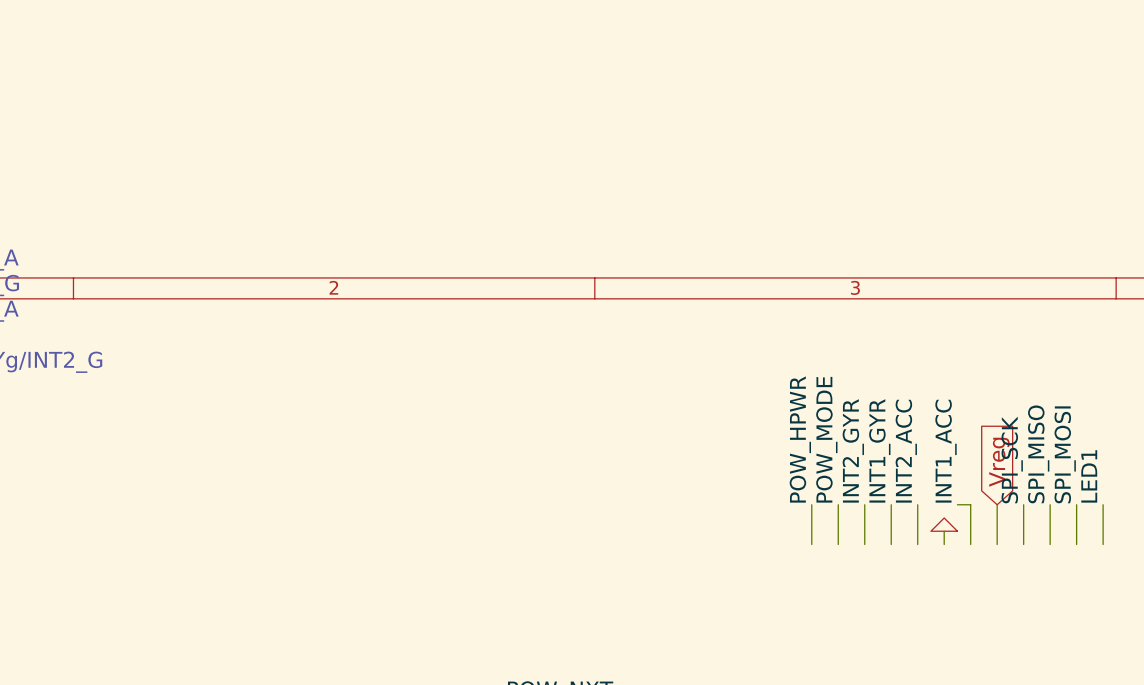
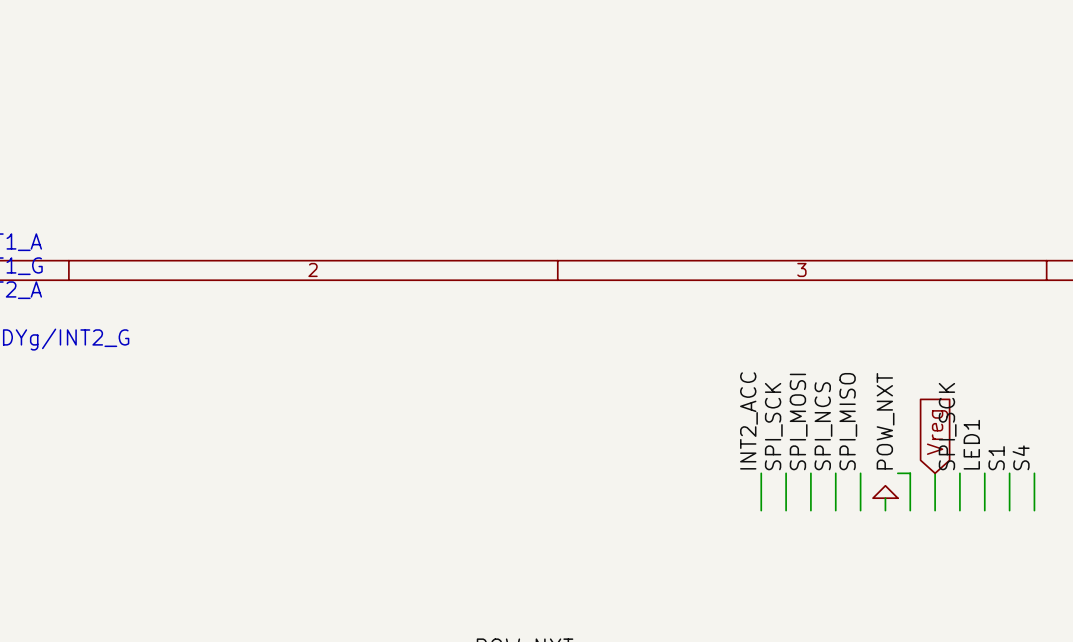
label: POW_HPWR (800, 439) -> INT2_ACC (748, 420)
label: POW_MODE (826, 439) -> SPI_SCK (773, 426)
label: INT2_GYR (853, 450) -> SPI_MOSI (798, 421)
label: INT1_GYR (879, 450) -> SPI_NCS (823, 426)
label: INT2_ACC (906, 451) -> SPI_MISO (848, 421)
label: INT1_ACC (946, 451) -> POW_NXT (885, 421)
label: SPI_MISO (1038, 454) -> LED1 (971, 444)
label: SPI_MOSI (1065, 454) -> S1 (996, 458)
label: LED1 (1089, 476) -> S4 (1021, 457)

